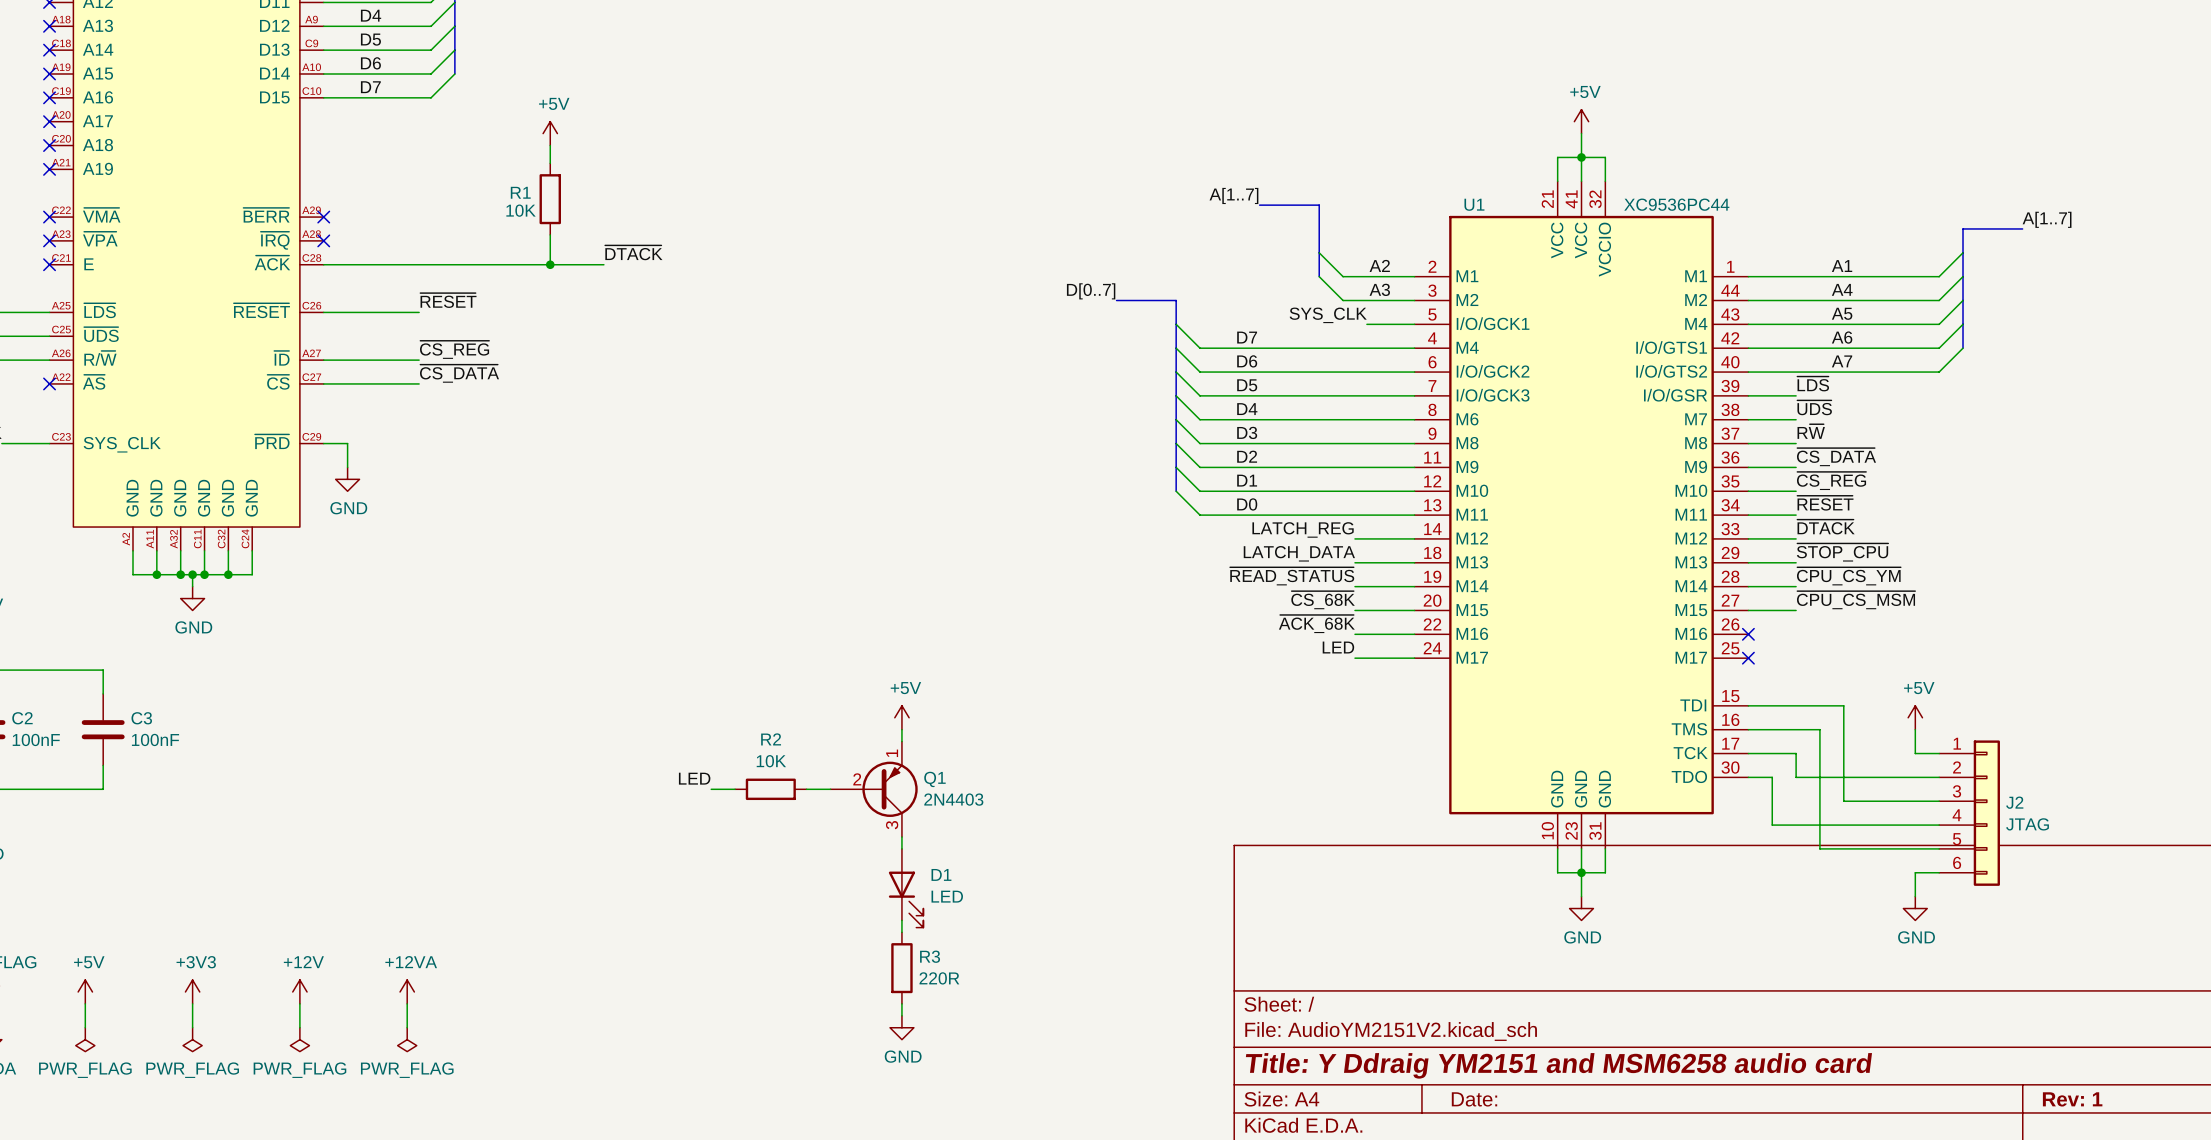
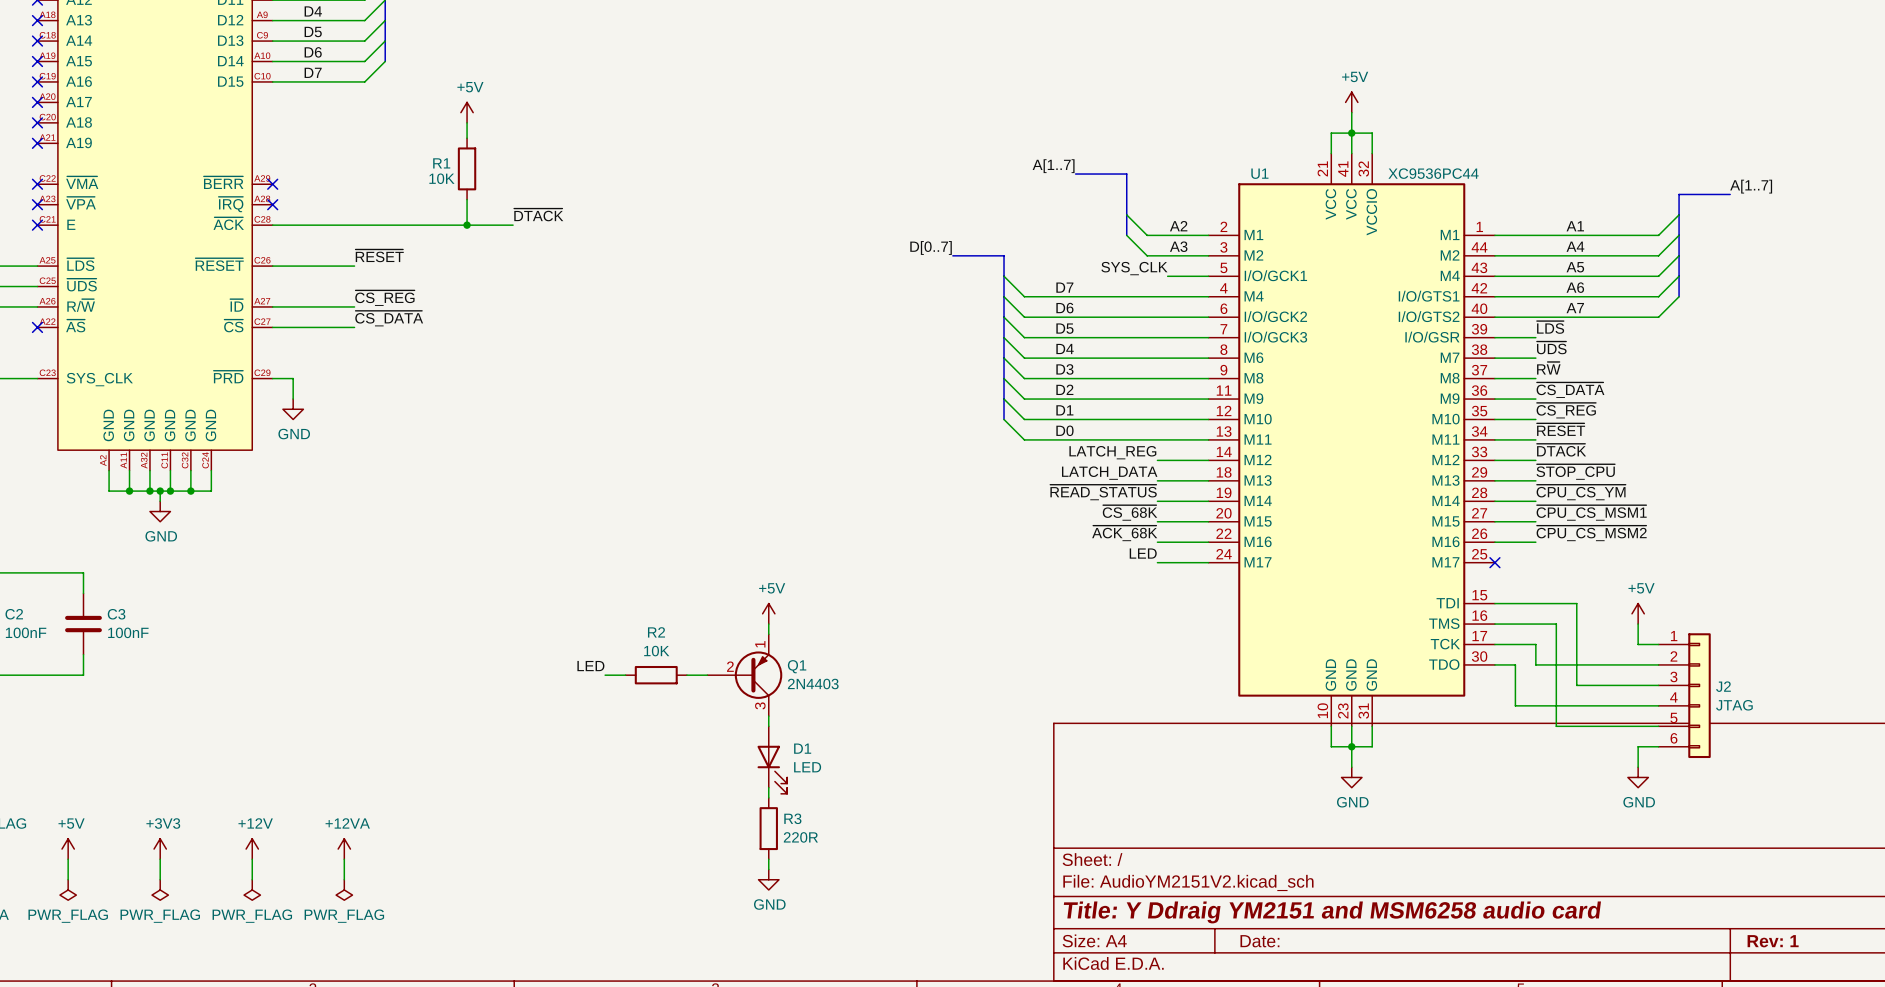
label: ~{CPU_CS_MSM} (1856, 600) -> ~{CPU_CS_MSM1} (1591, 512)
label: none -> ~{CPU_CS_MSM2} (1591, 533)
wire: none -> (1494, 542) (1535, 542)
no-connect mark: (1748, 634) -> none

